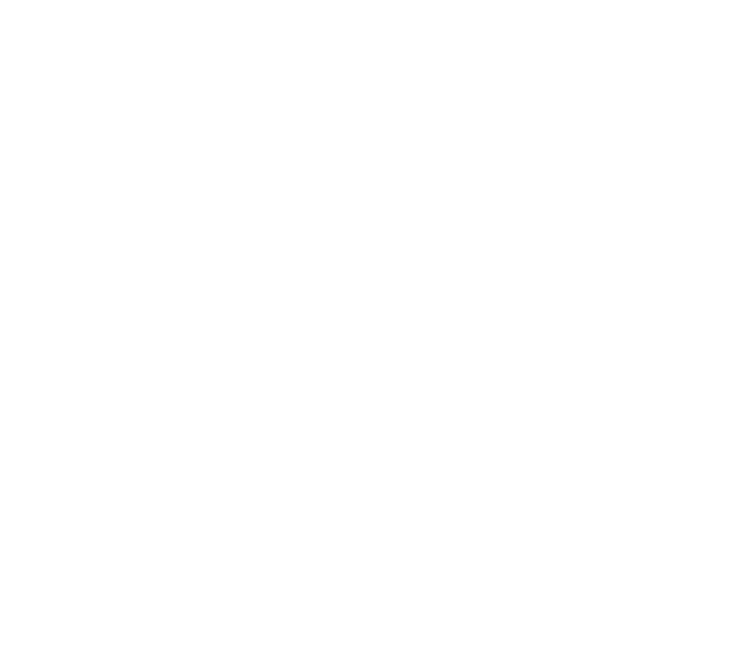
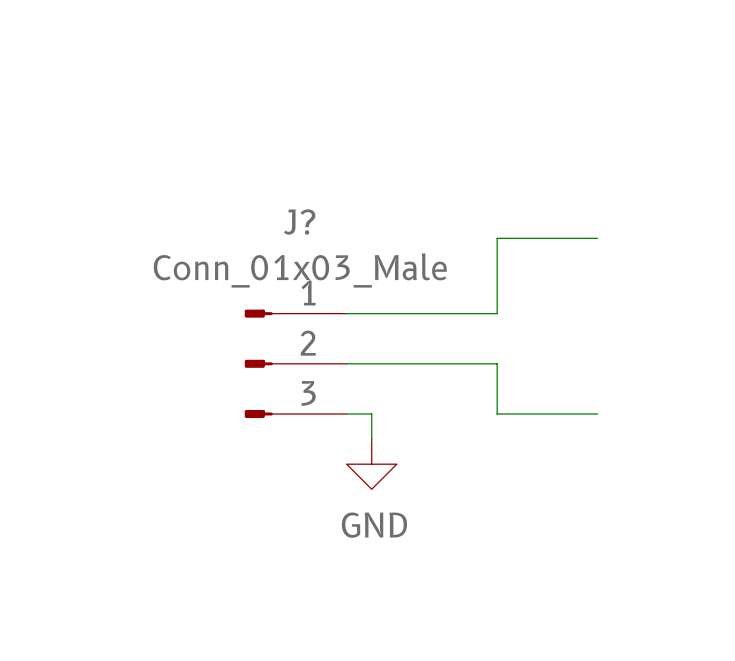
wire: none -> (597, 238) (497, 238) (497, 313) (346, 313)
J?: none -> Conn_01x03_Male (295, 363)
wire: none -> (346, 363) (497, 363) (497, 414) (597, 414)
wire: none -> (346, 414) (371, 414) (371, 439)
power symbol: none -> GND (371, 464)

